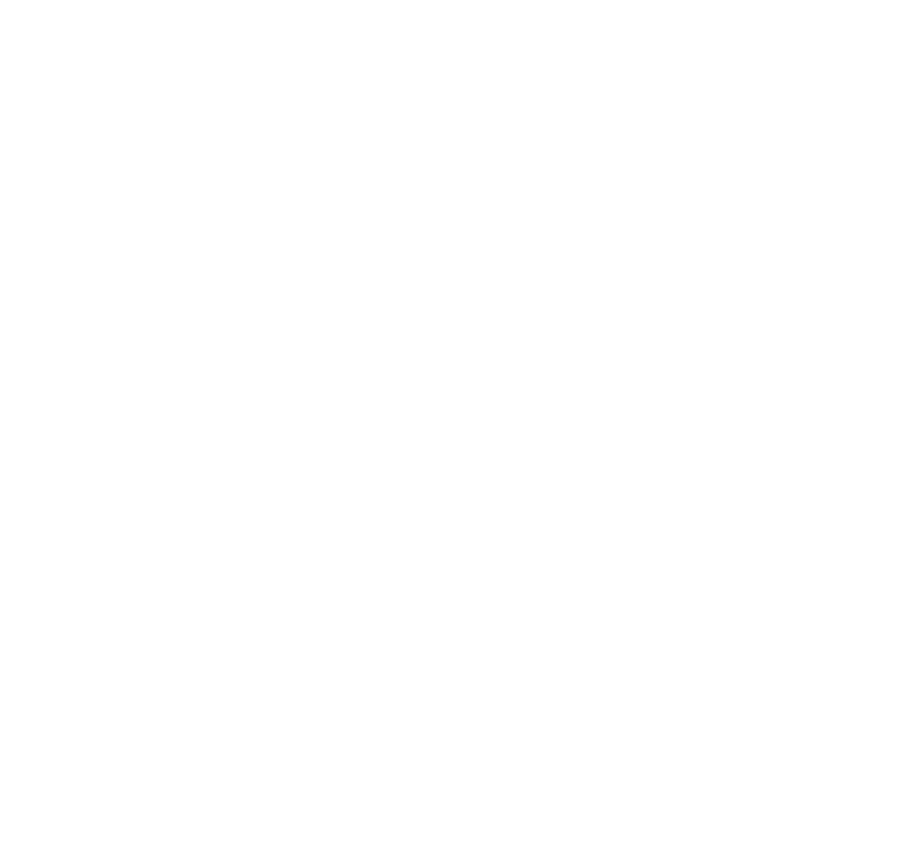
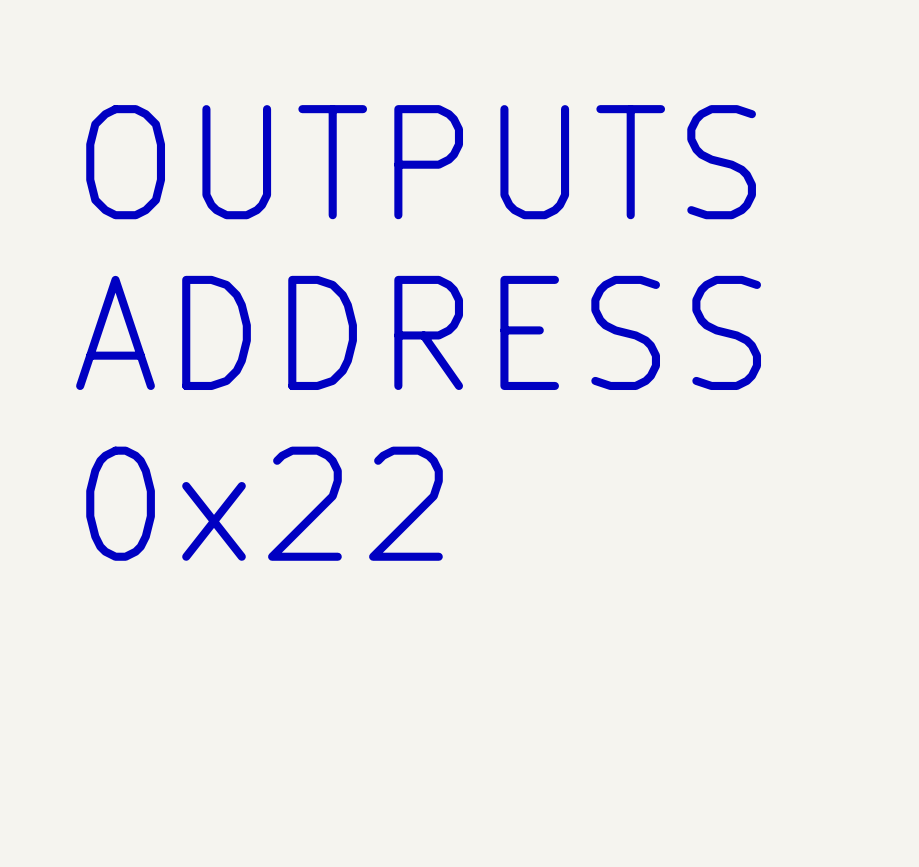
text: none -> OUTPUTS (421, 162)
text: none -> ADDRESS (418, 332)
text: none -> 0x22 (264, 503)

